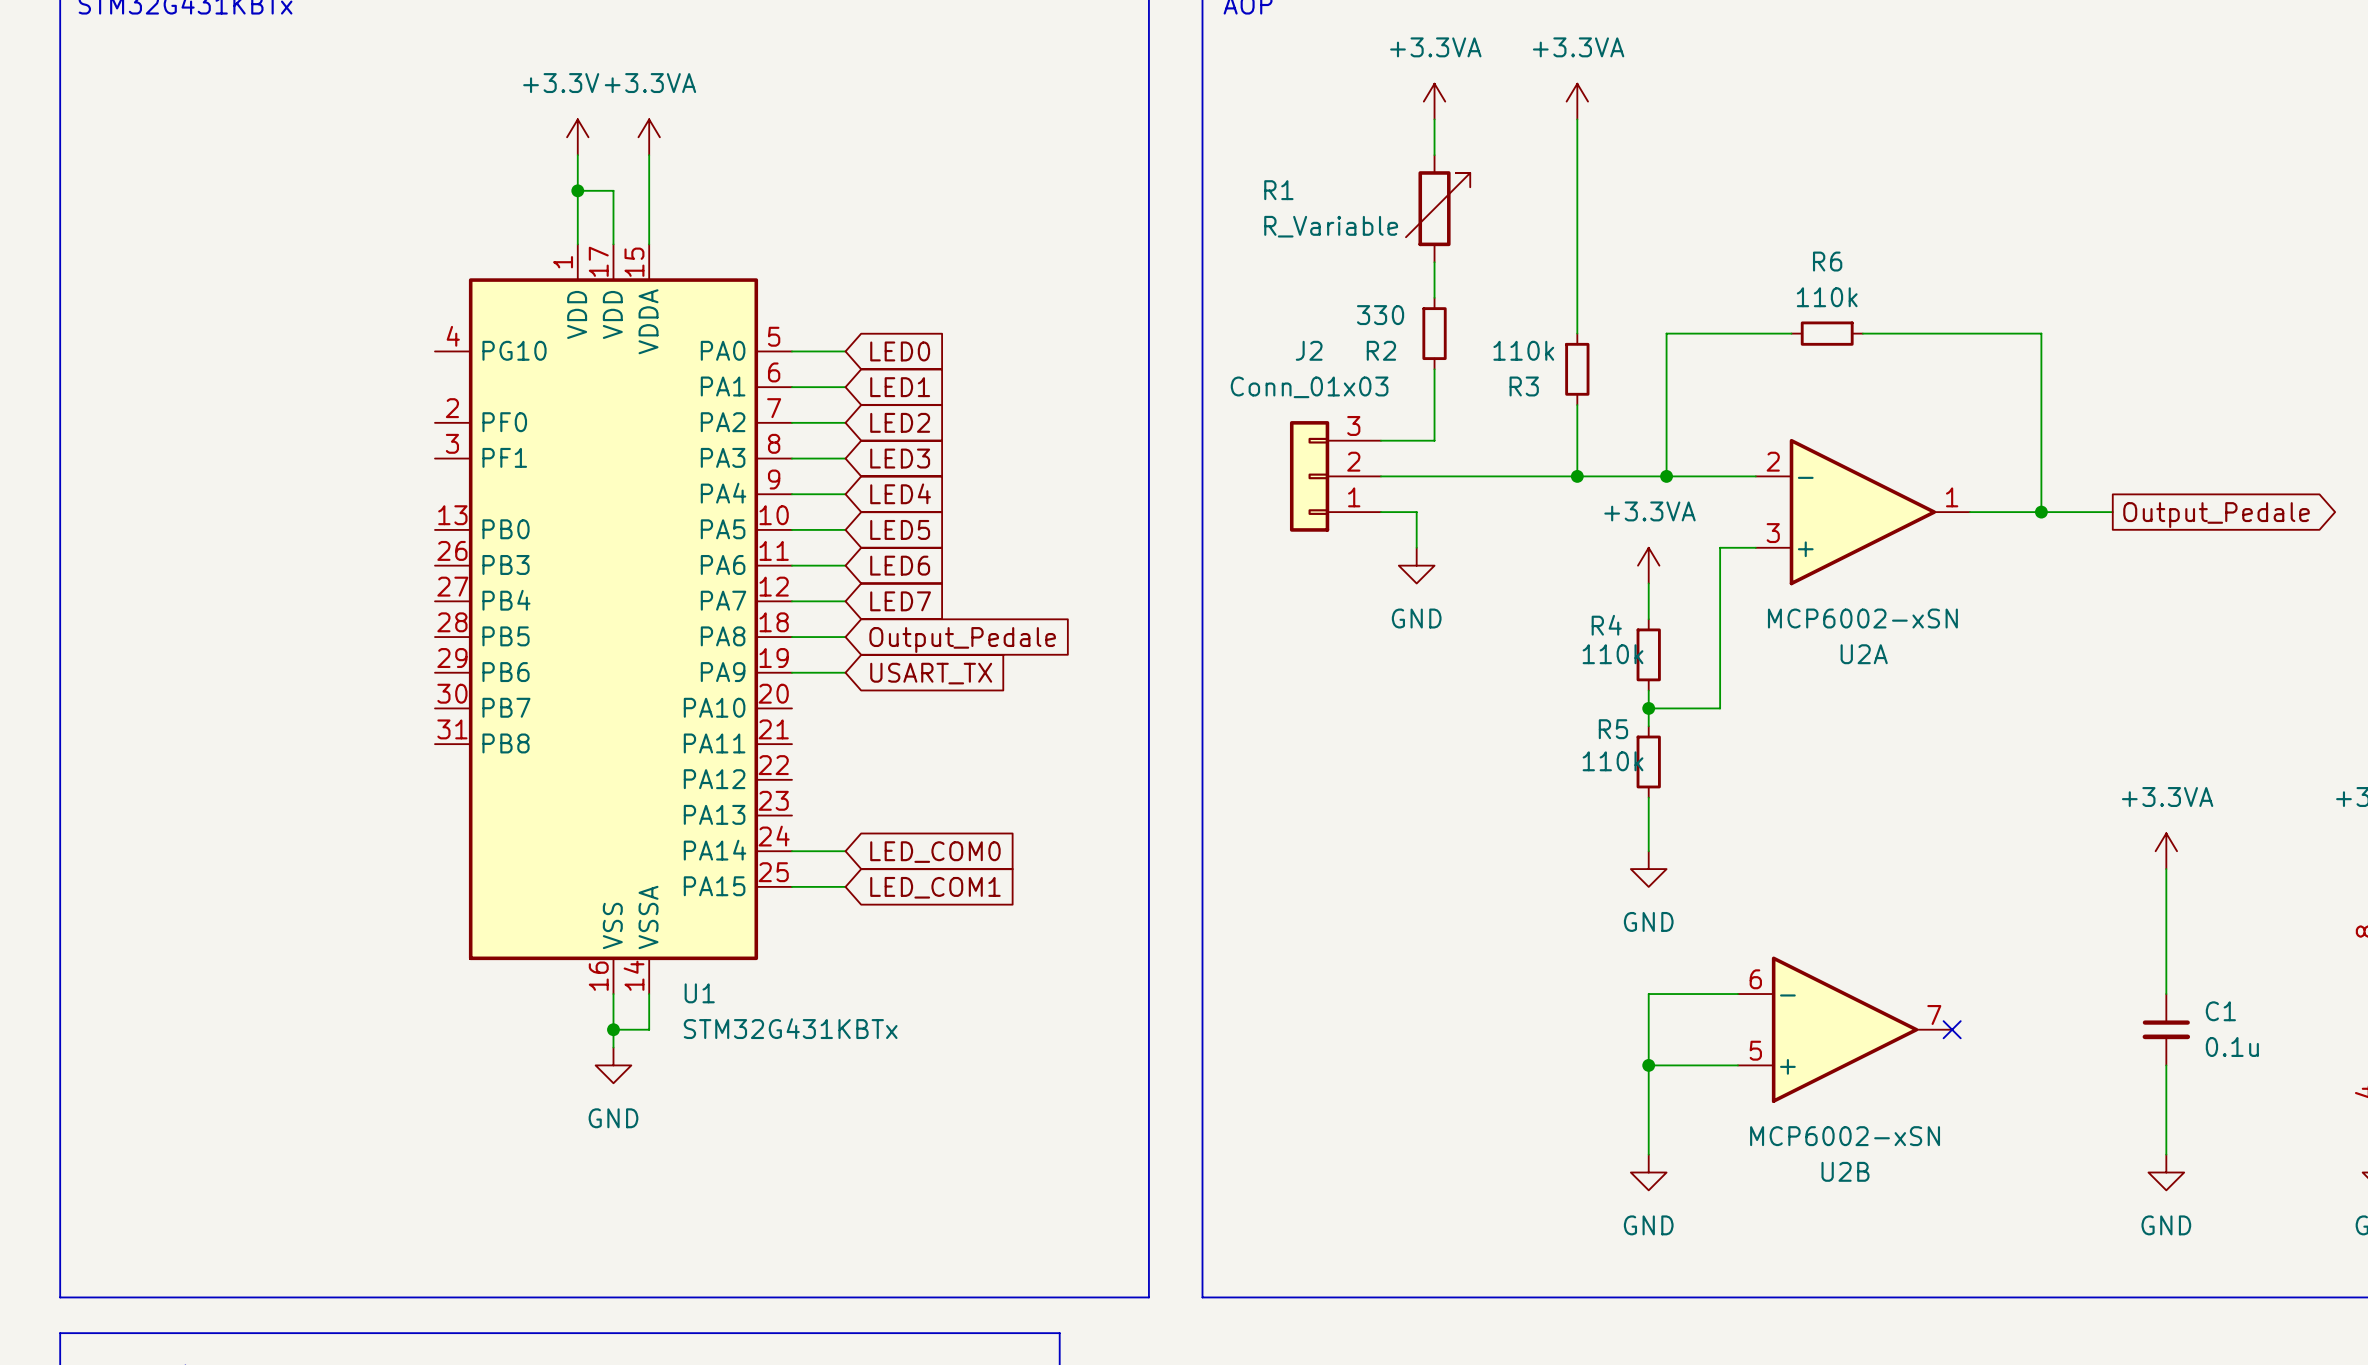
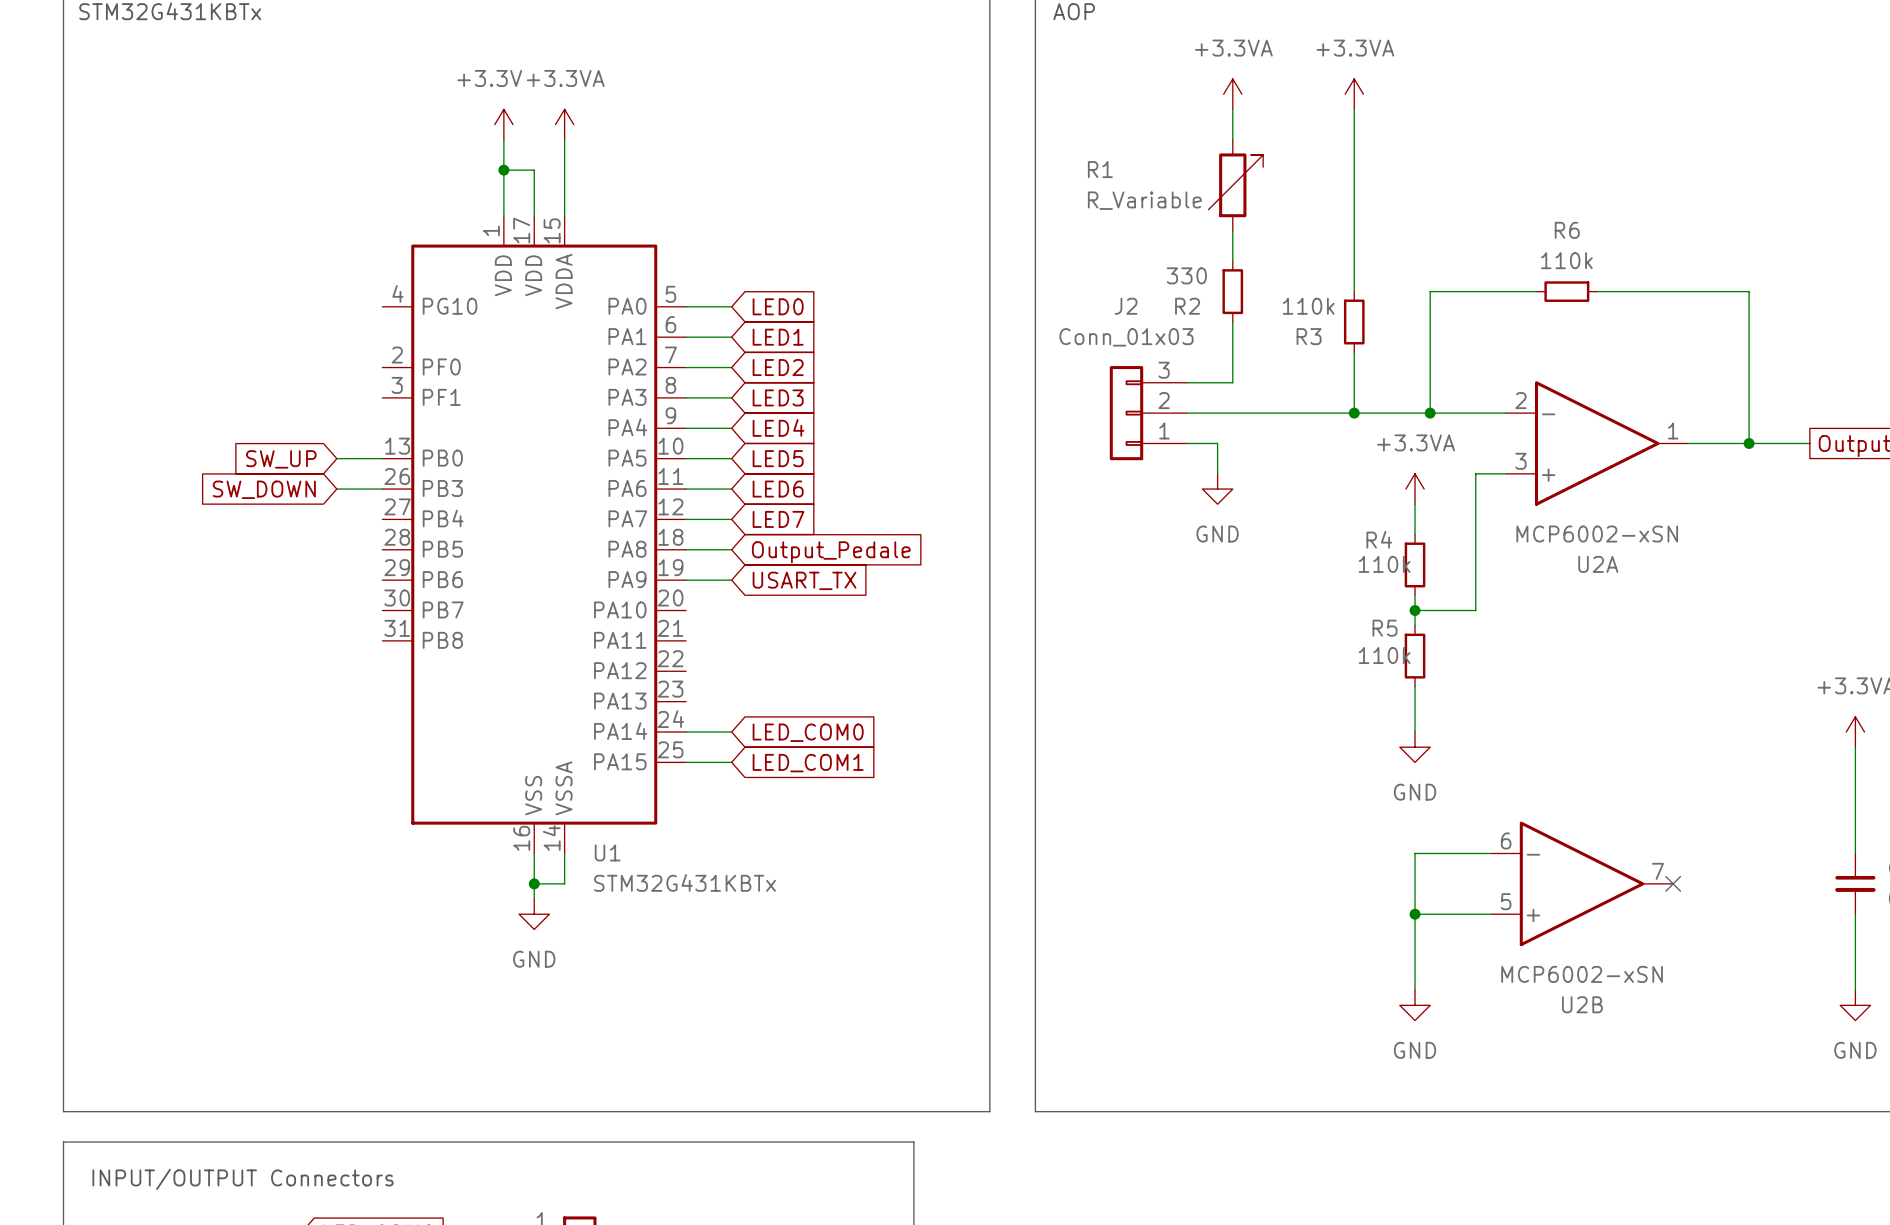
wire: none -> (336, 458) (382, 458)
global label: none -> SW_UP (281, 459)
wire: none -> (336, 489) (382, 489)
global label: none -> SW_DOWN (264, 489)

